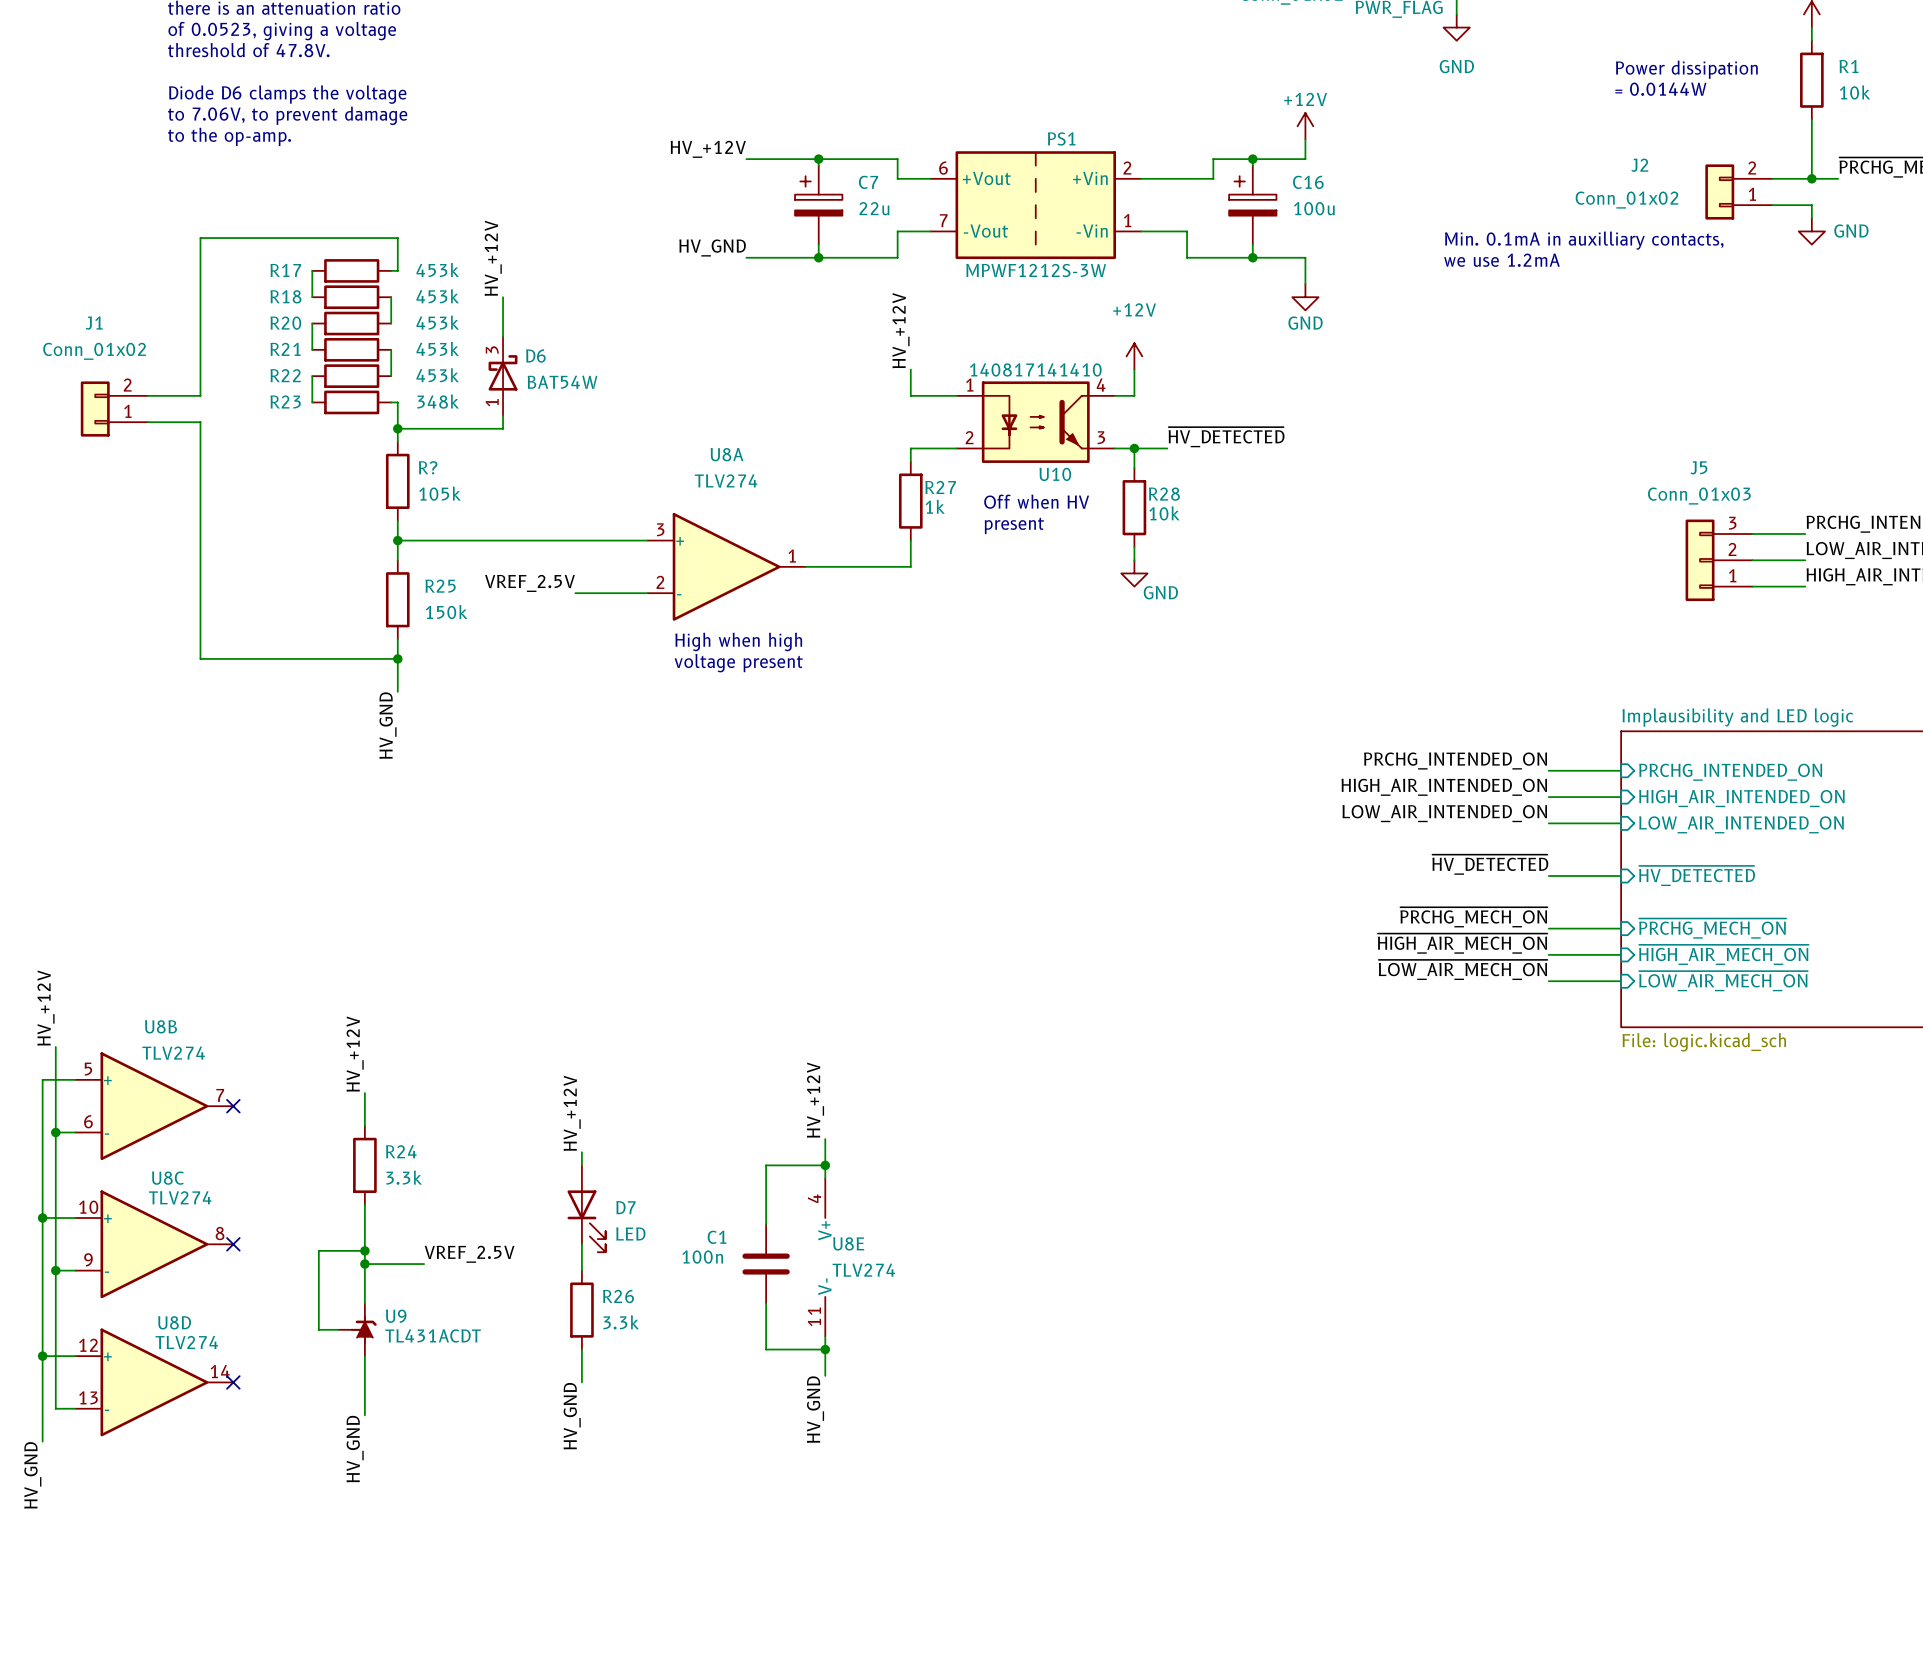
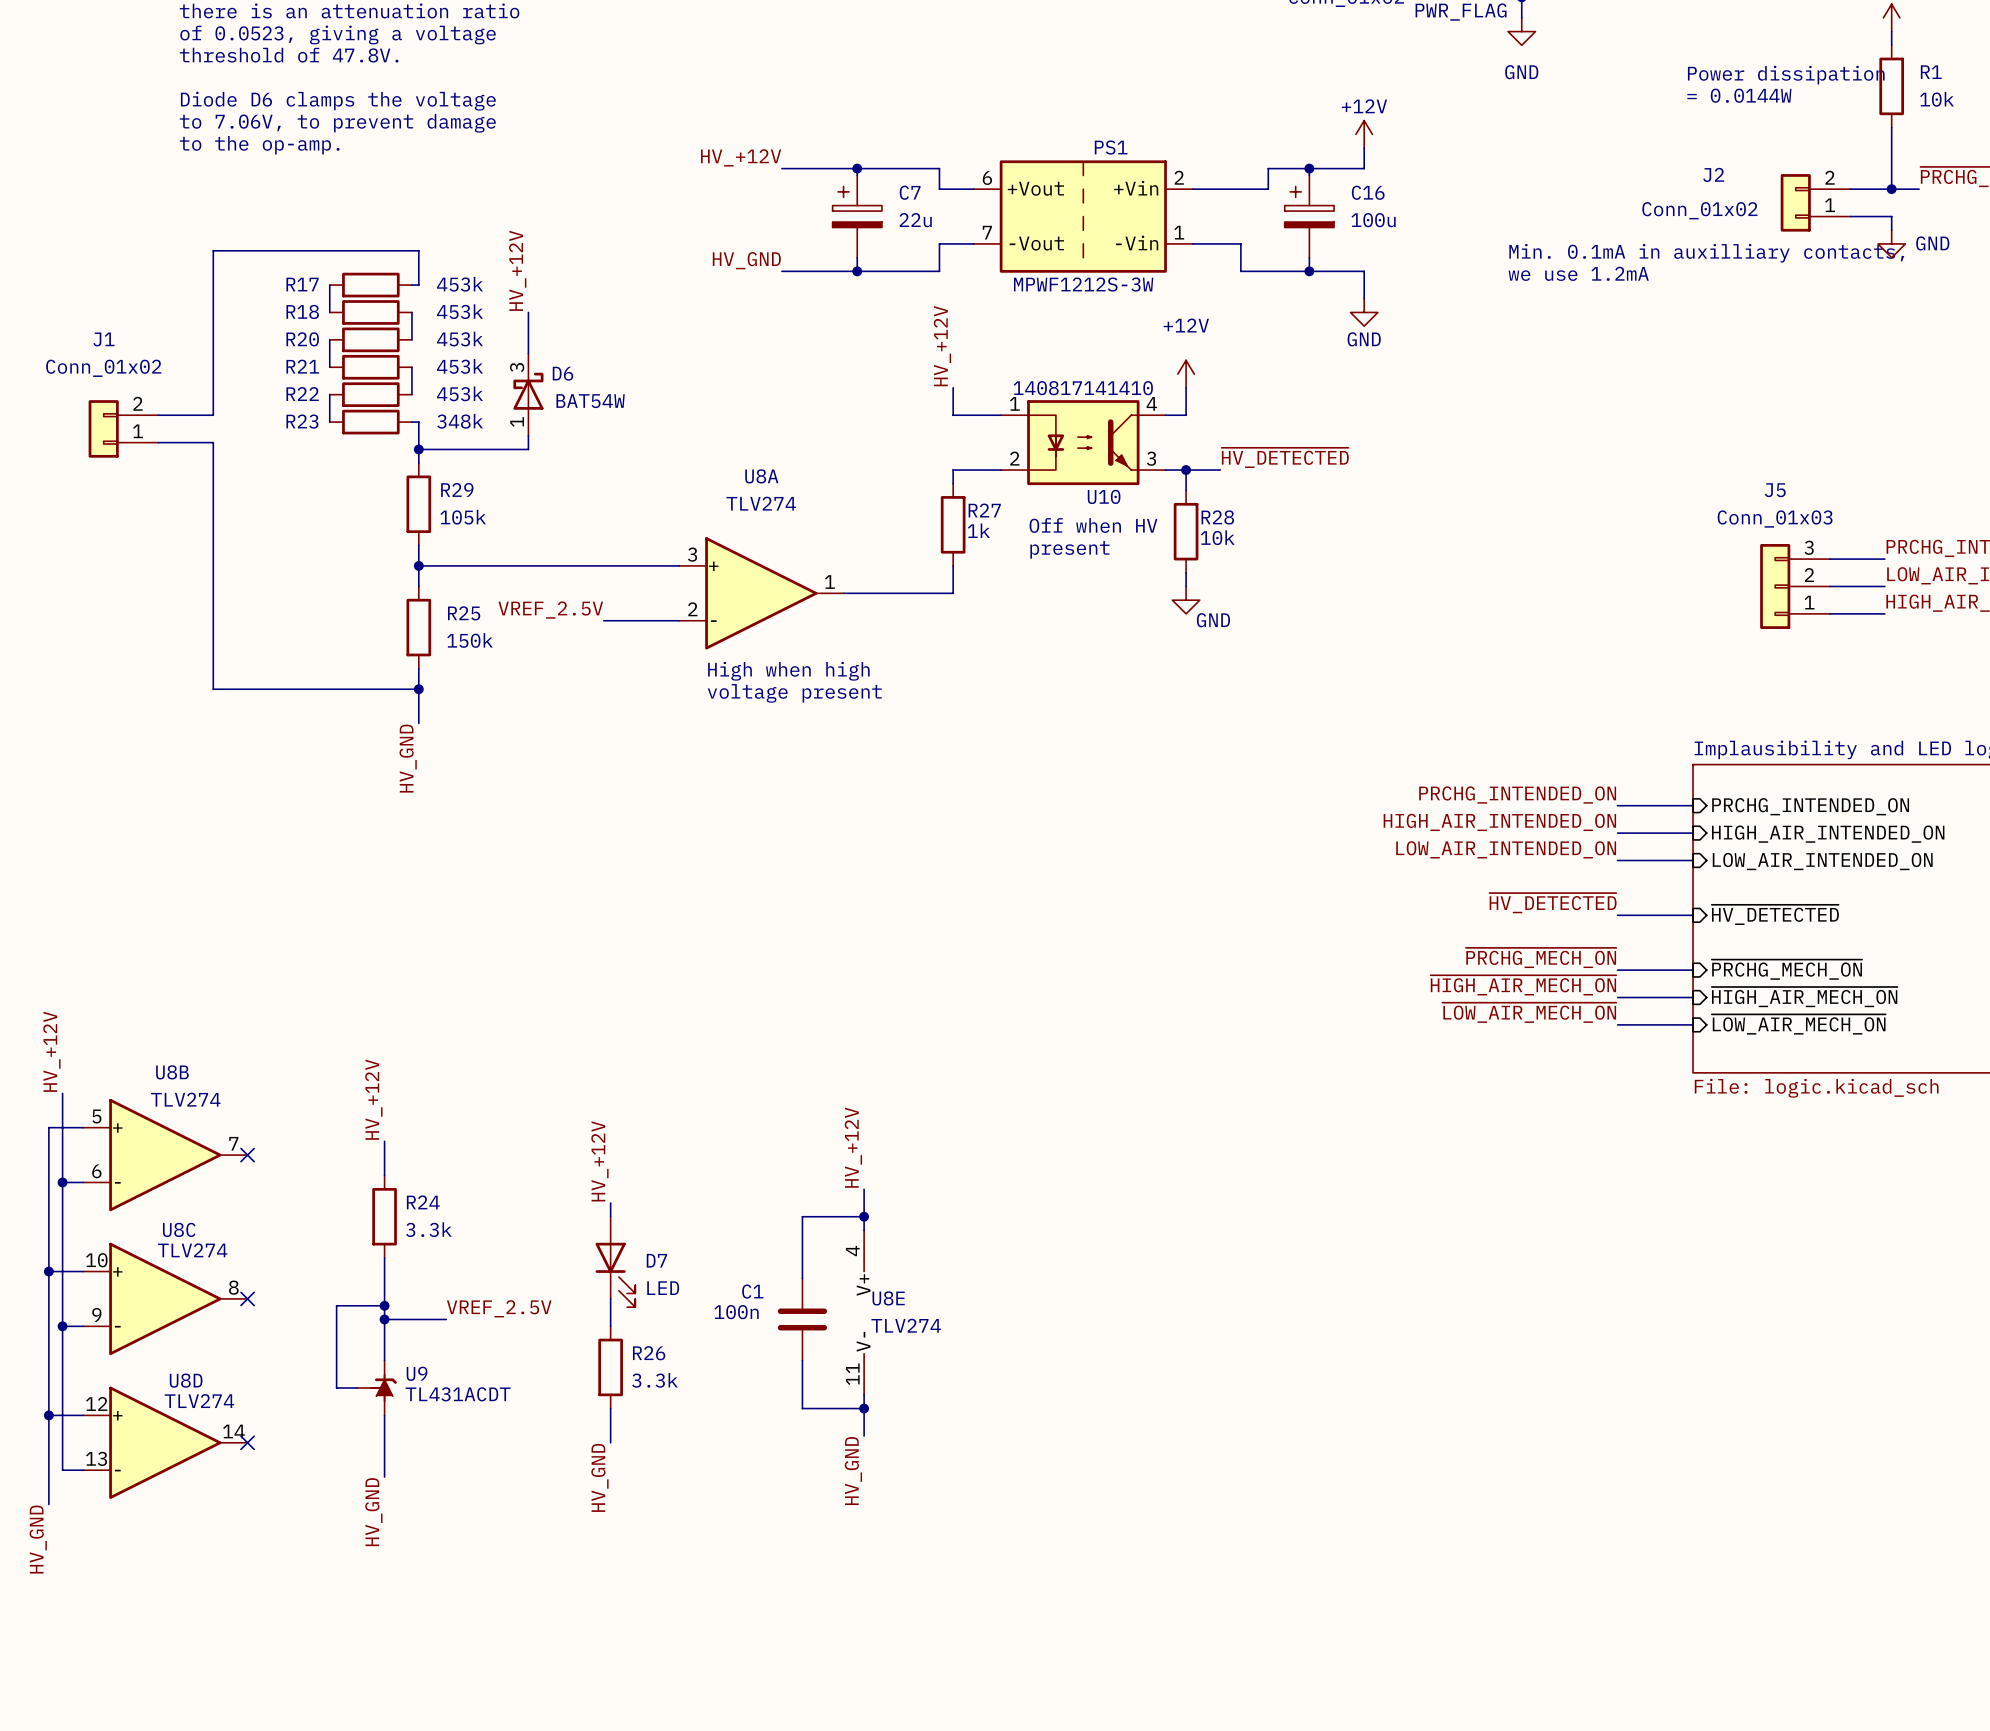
R? name: R? (428, 467) -> R29 (457, 489)

